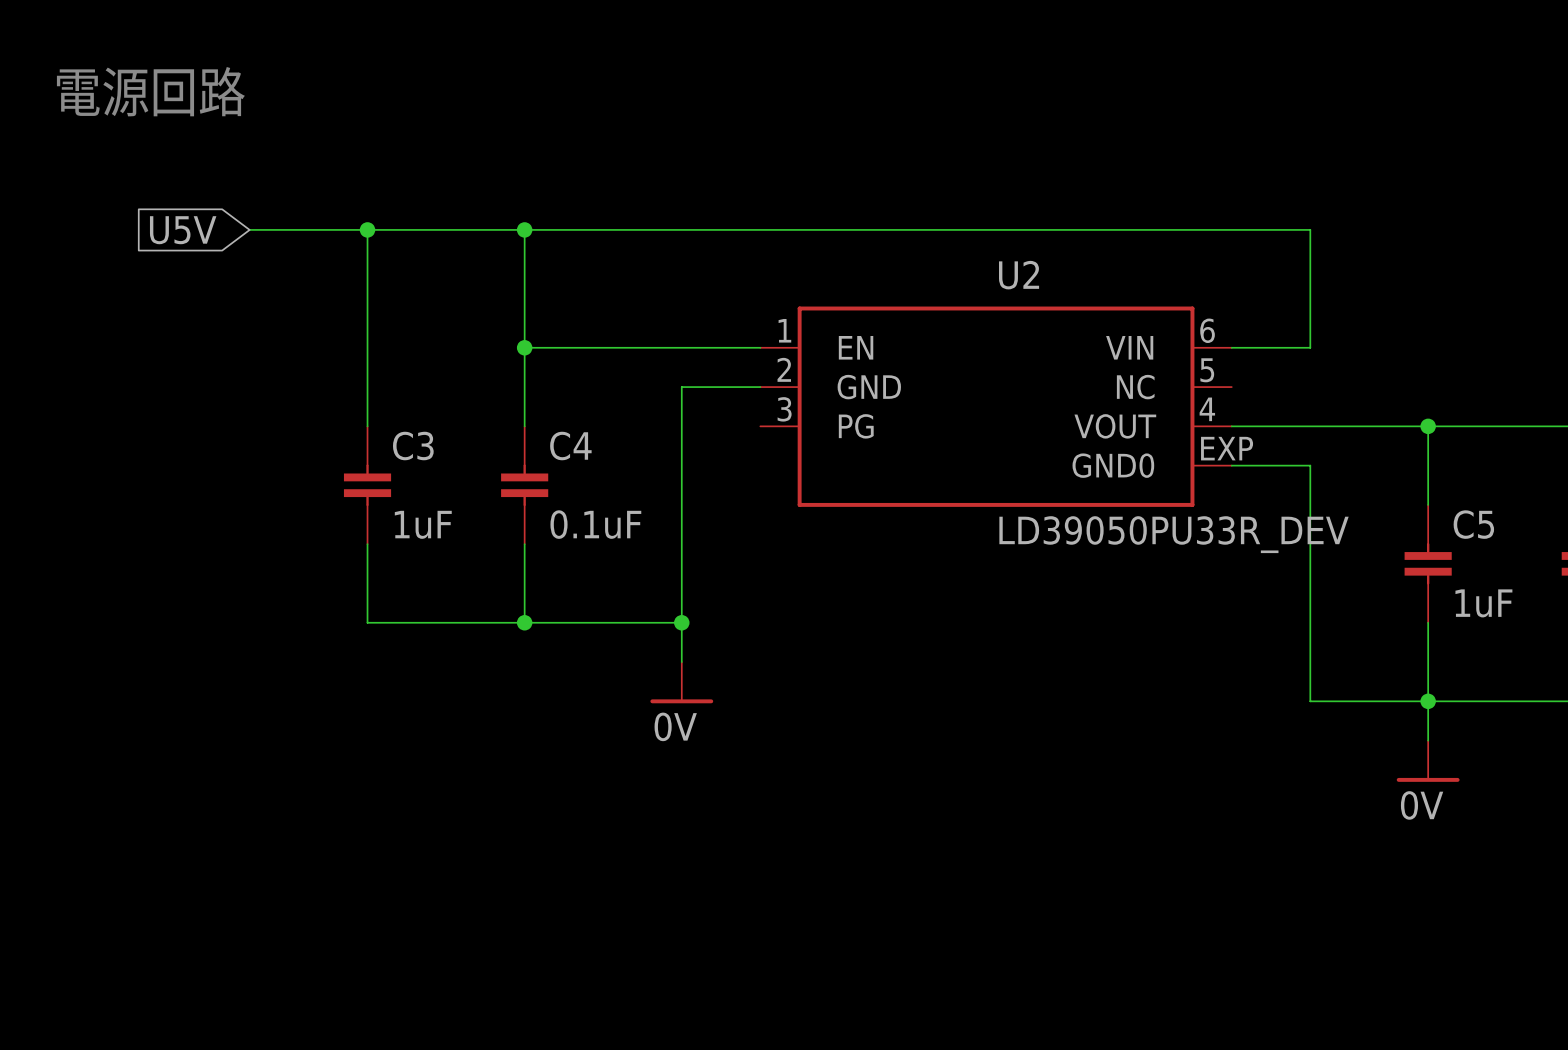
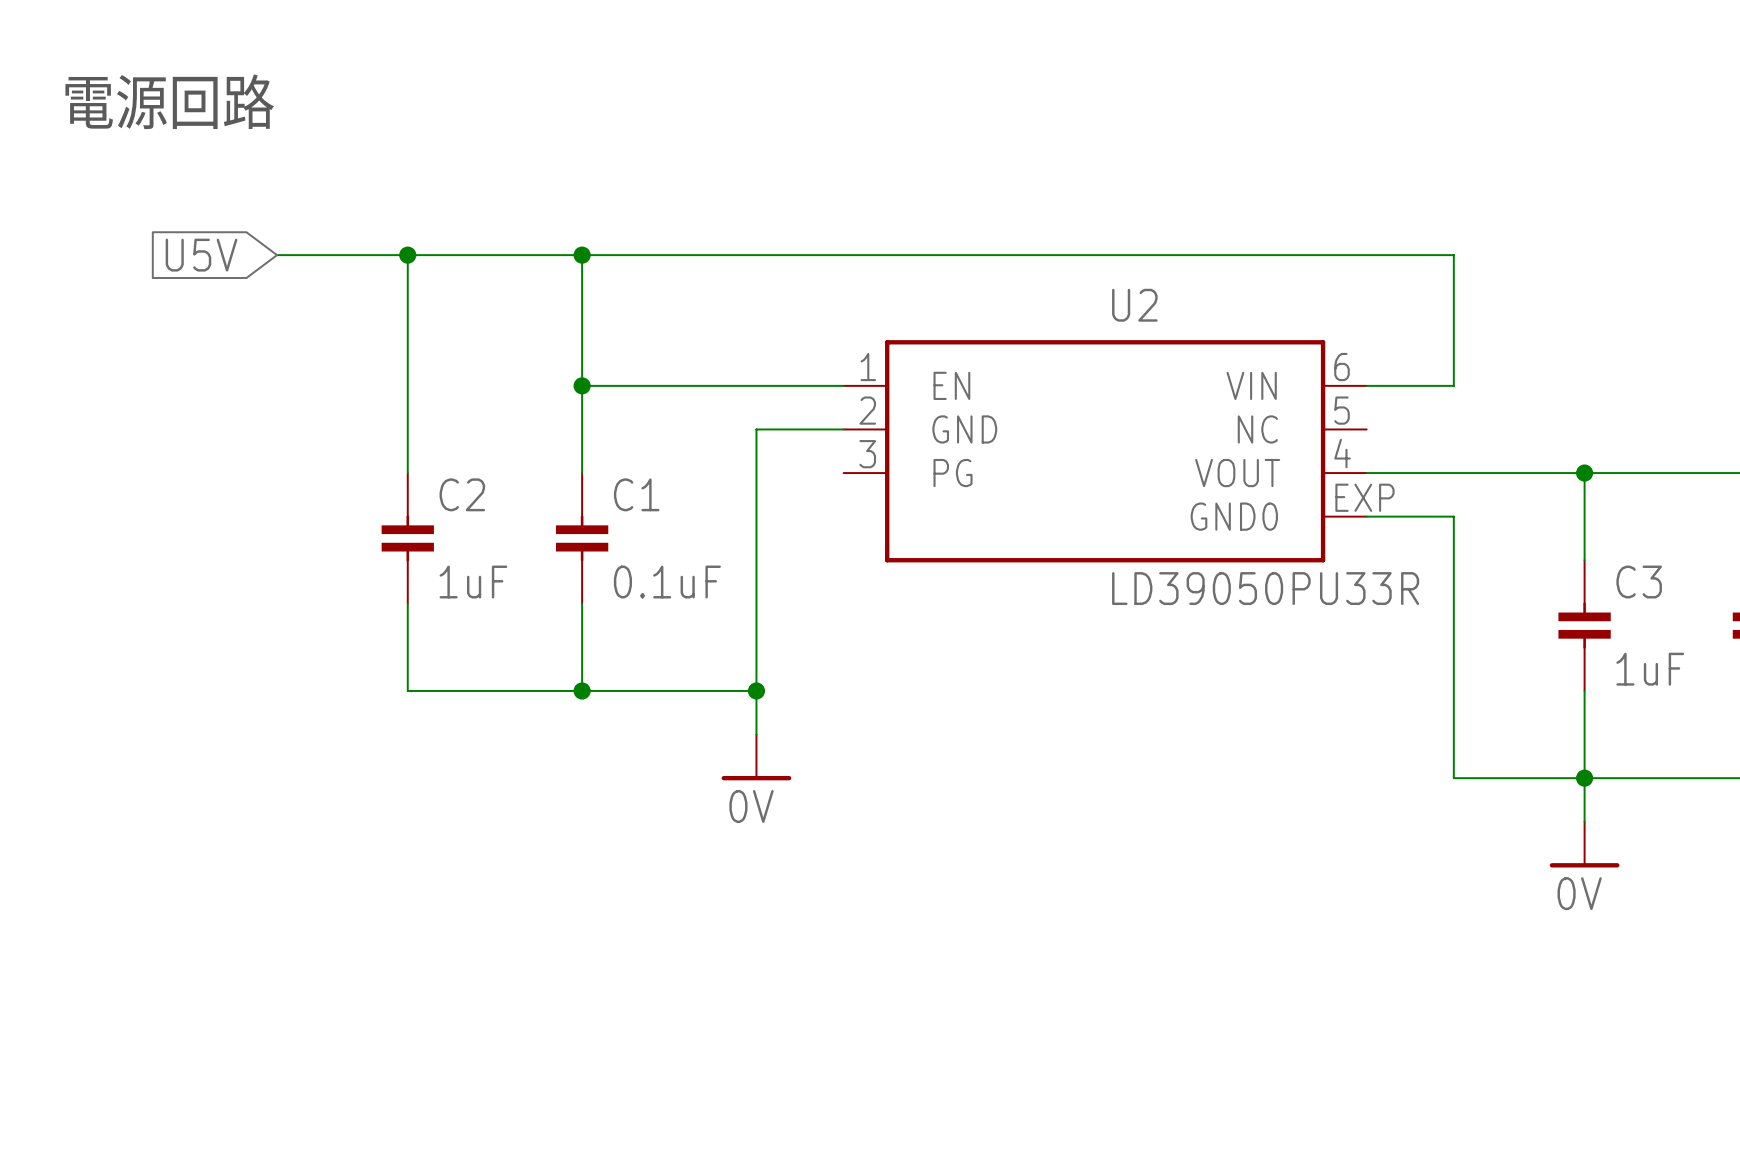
C3 name: C3 (413, 446) -> C2 (462, 494)
C4 name: C4 (570, 446) -> C1 (636, 494)
C5 name: C5 (1473, 524) -> C3 (1639, 582)
U2 value: LD39050PU33R_DEV (1174, 534) -> LD39050PU33R (1265, 588)

